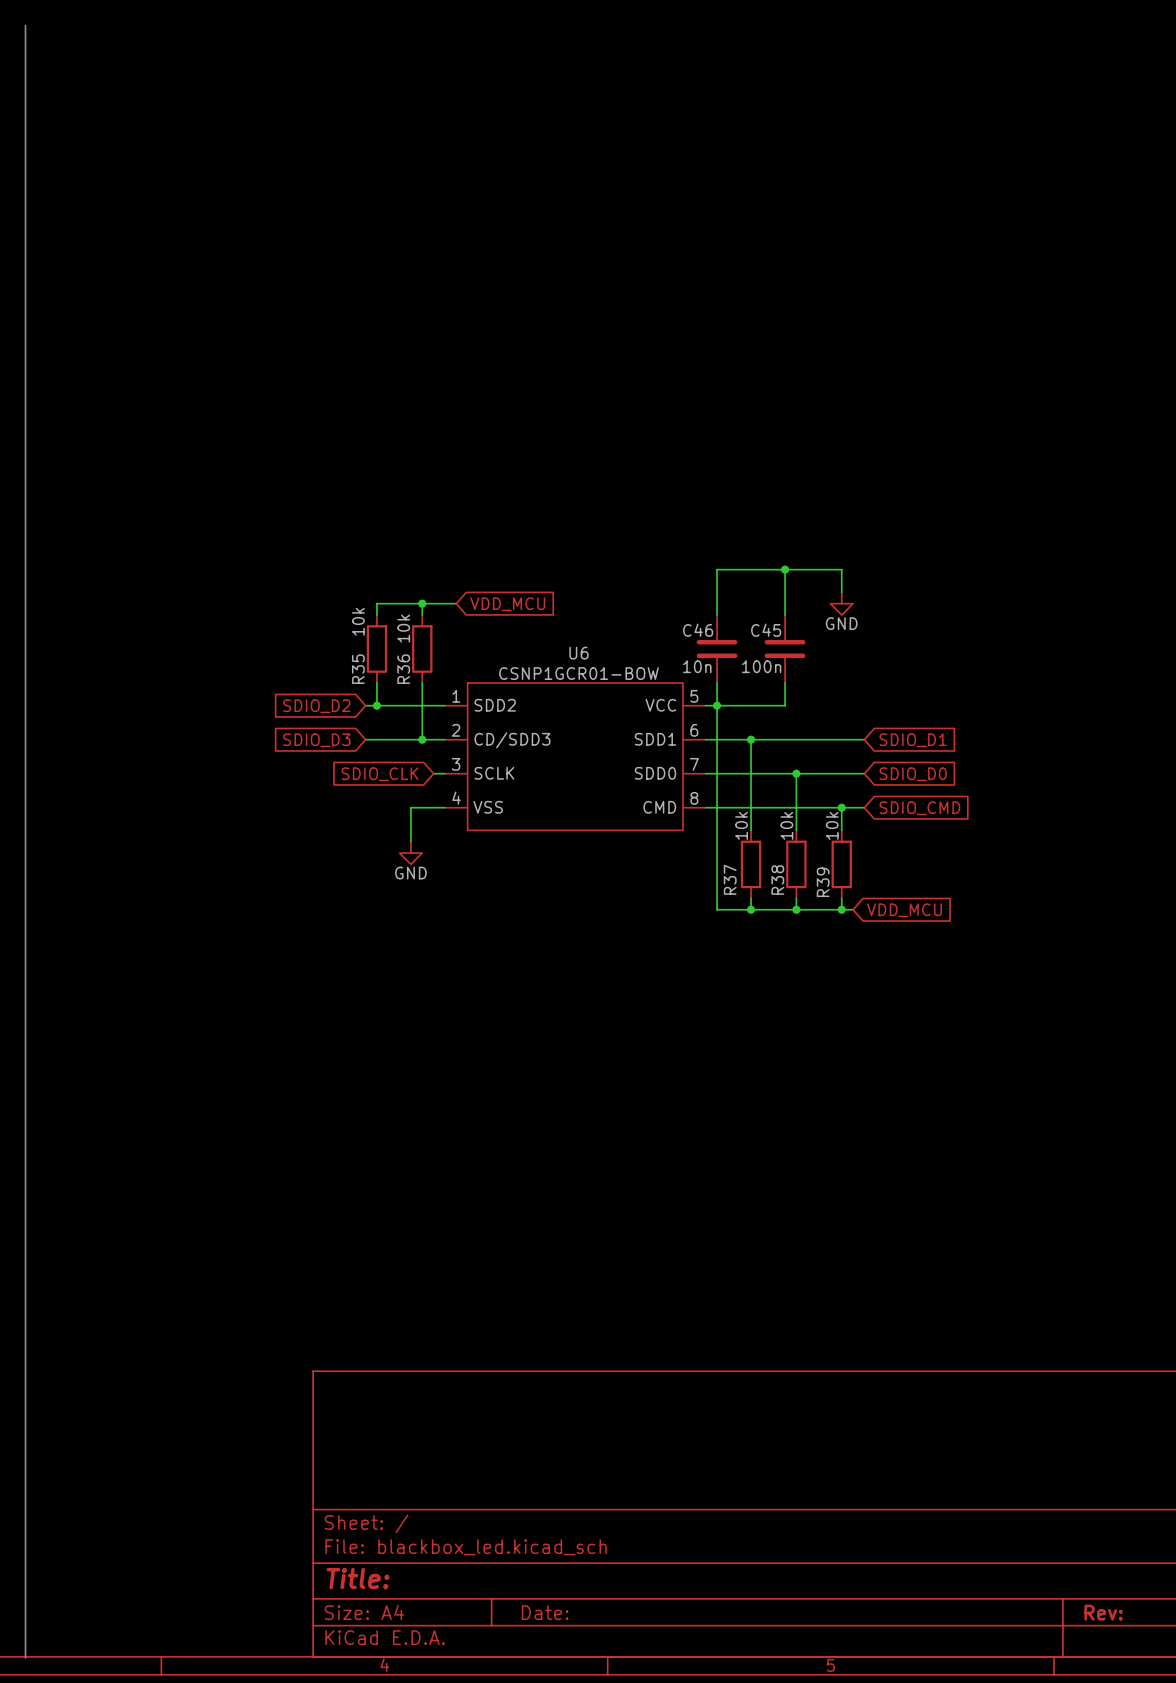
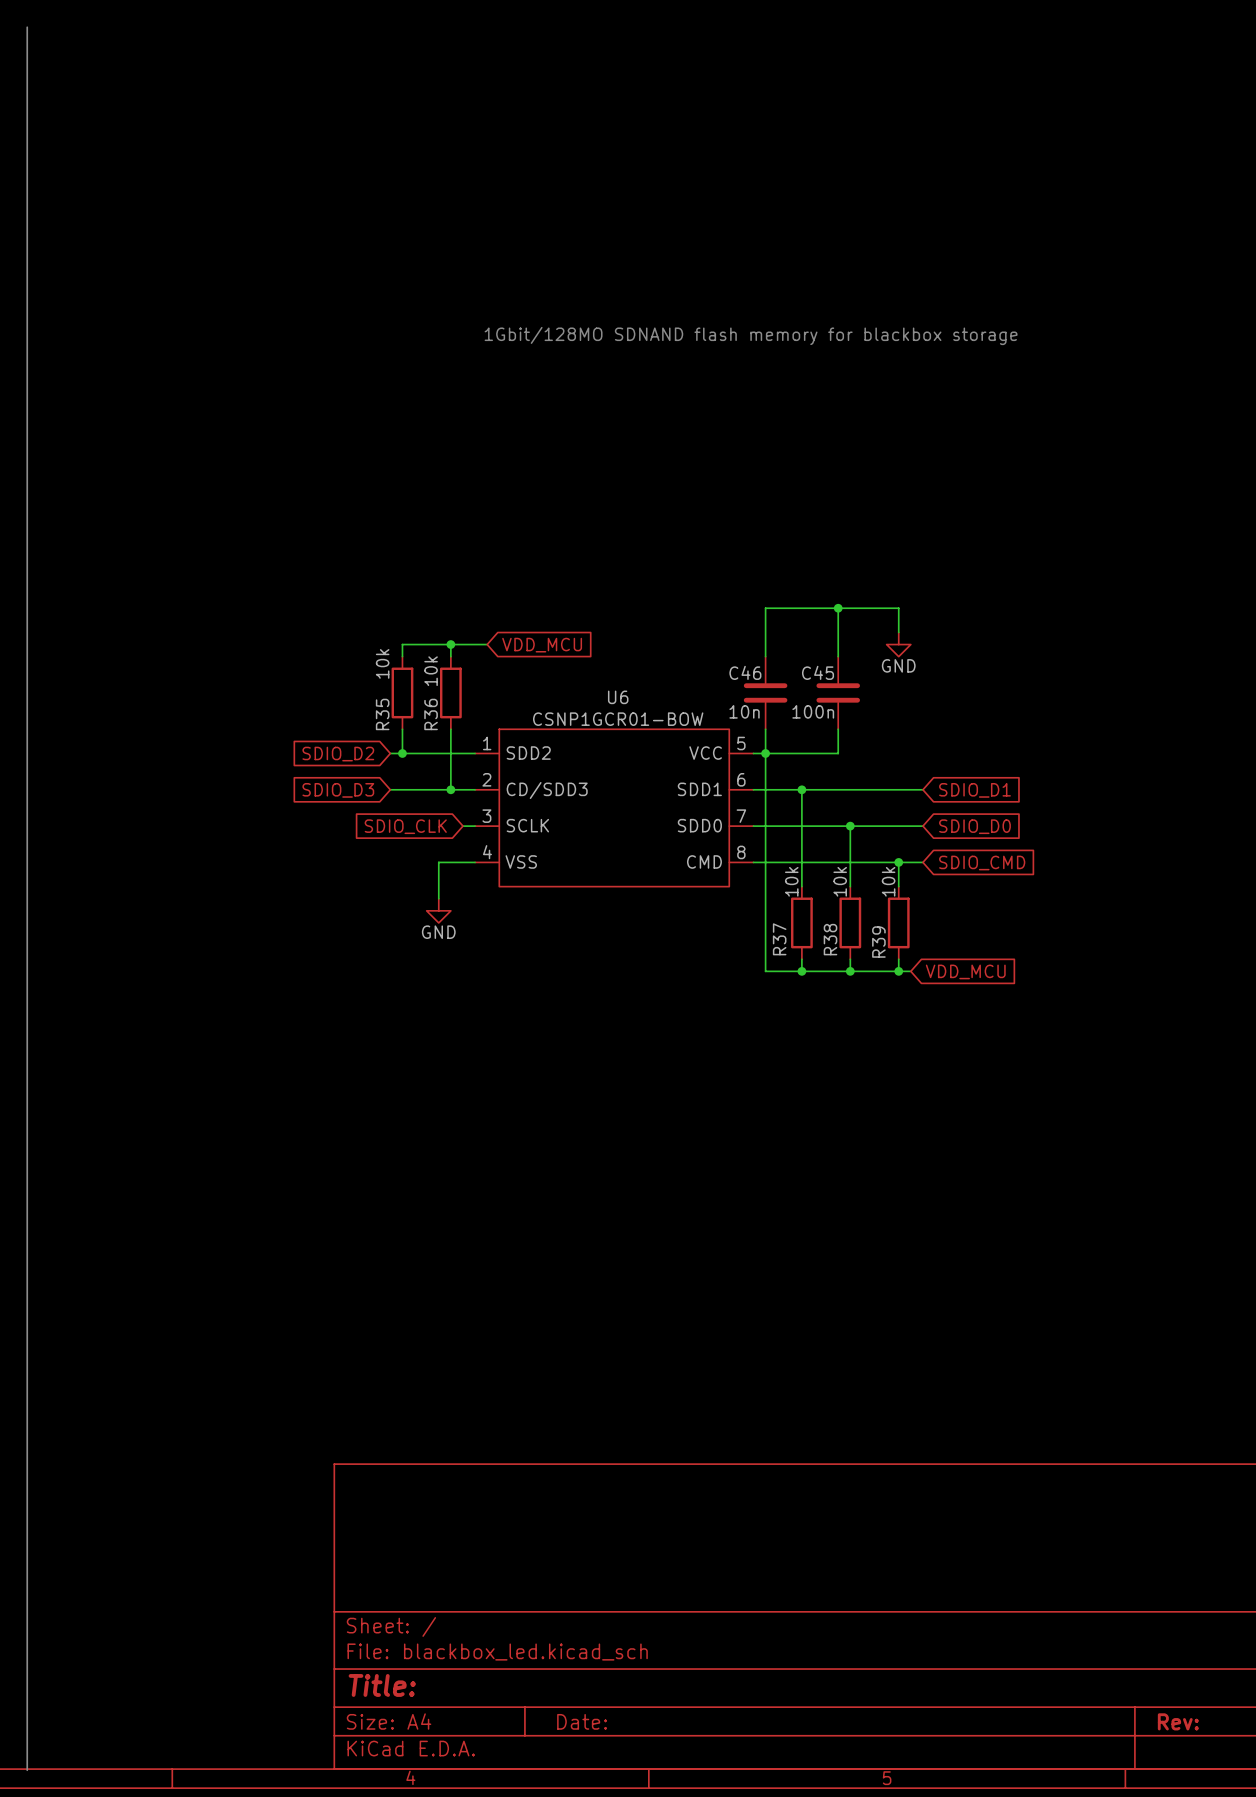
text: none -> 1Gbit/128MO SDNAND flash memory for blackbox storage (751, 335)

